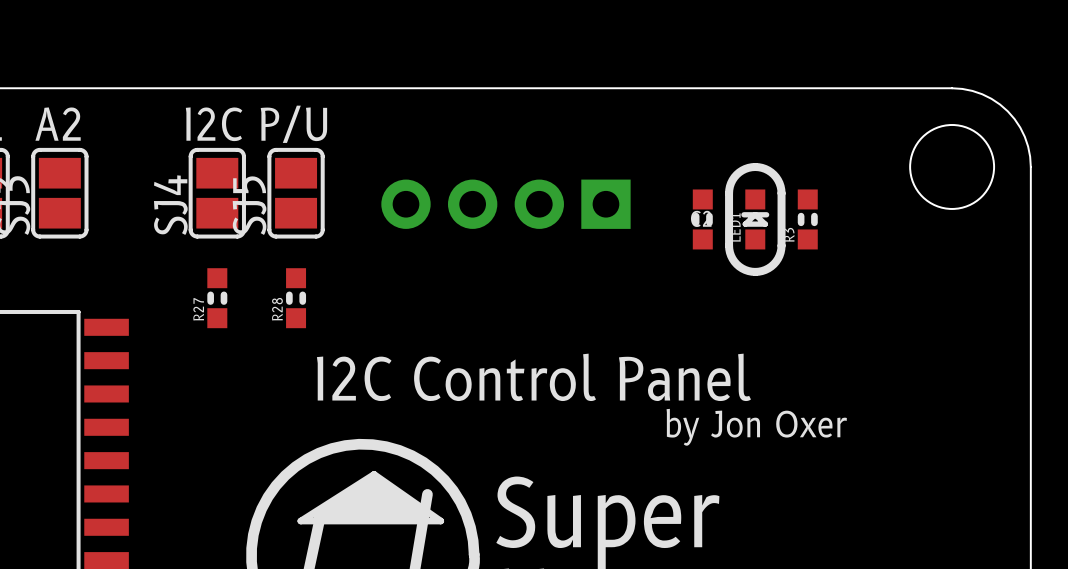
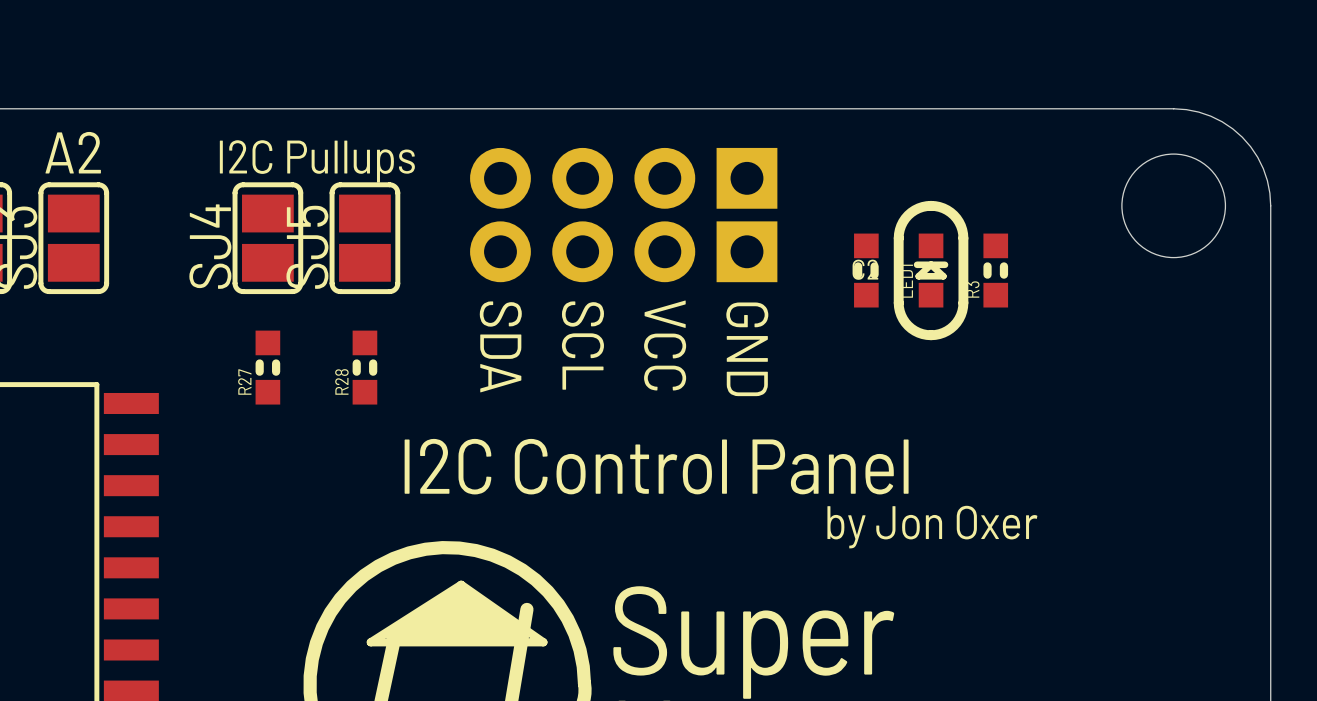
text: I2C P/U (256, 124) -> I2C Pullups (317, 161)
part: none -> (623, 178)
text: none -> SCL (582, 345)
text: none -> SDA (500, 346)
text: none -> VCC (665, 345)
text: none -> GND (747, 349)

